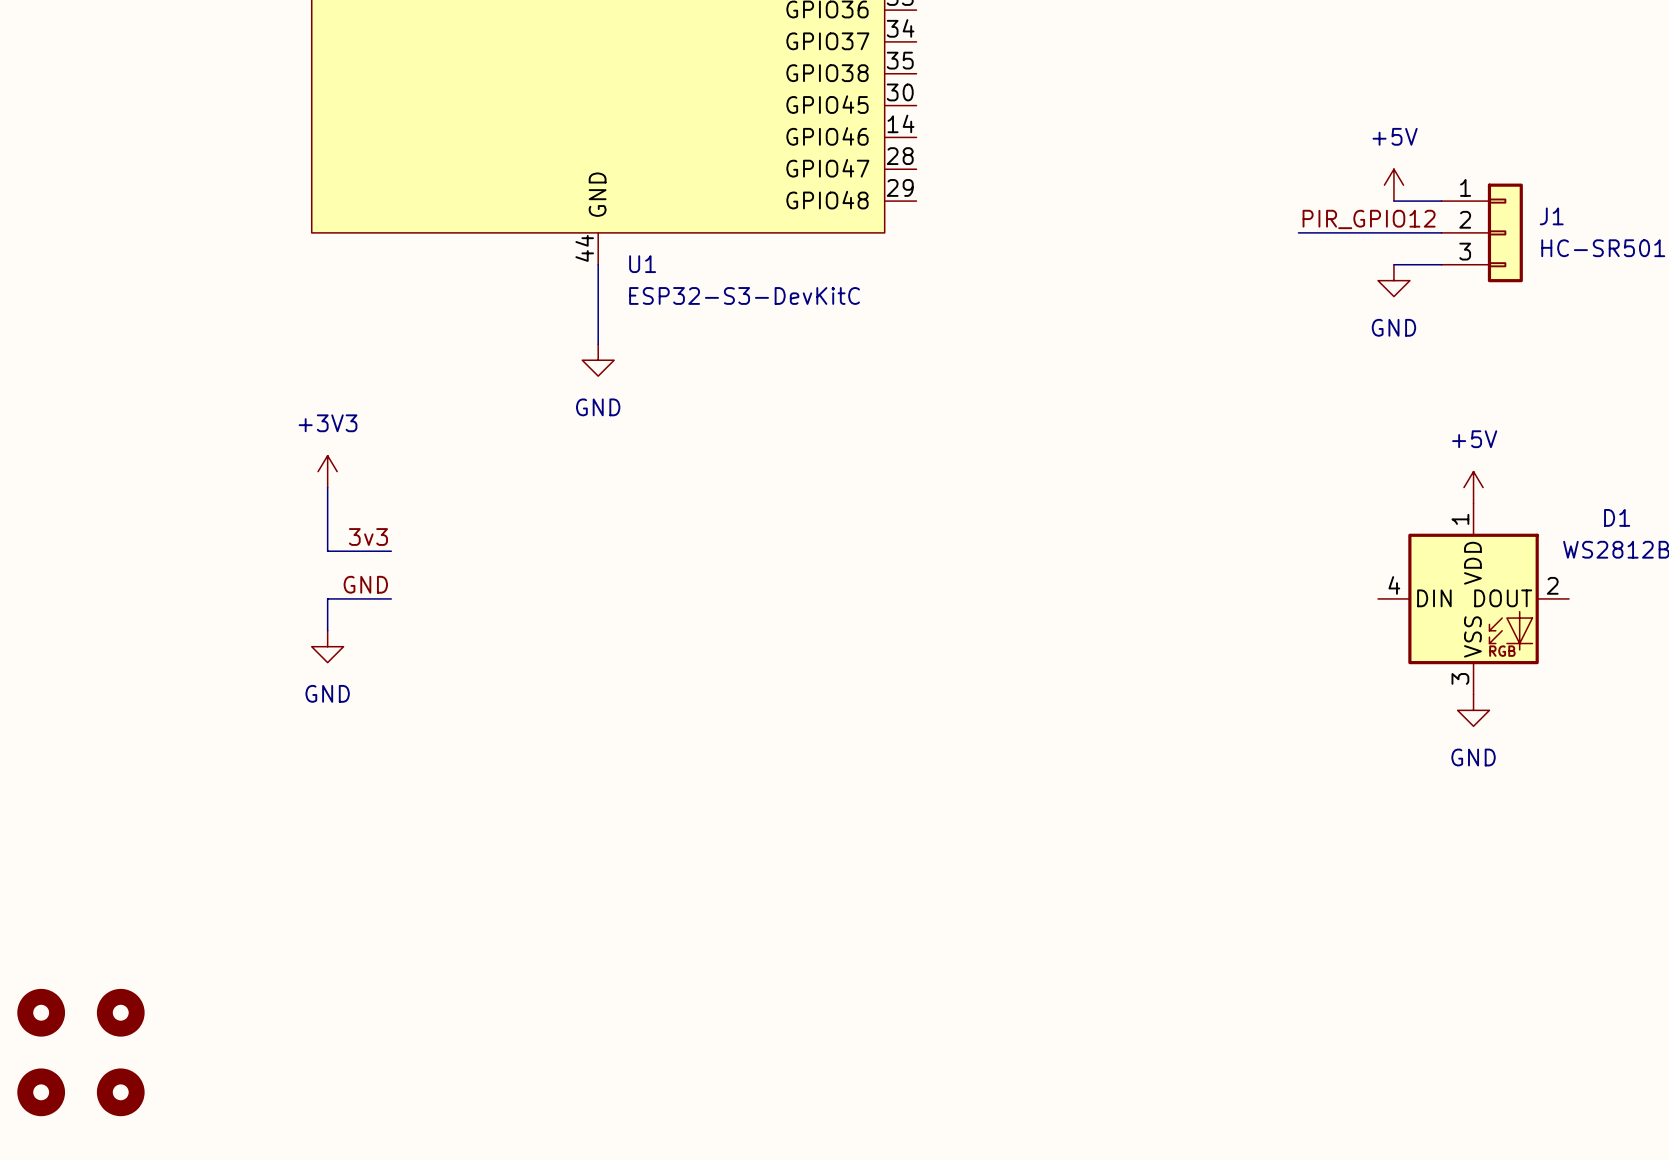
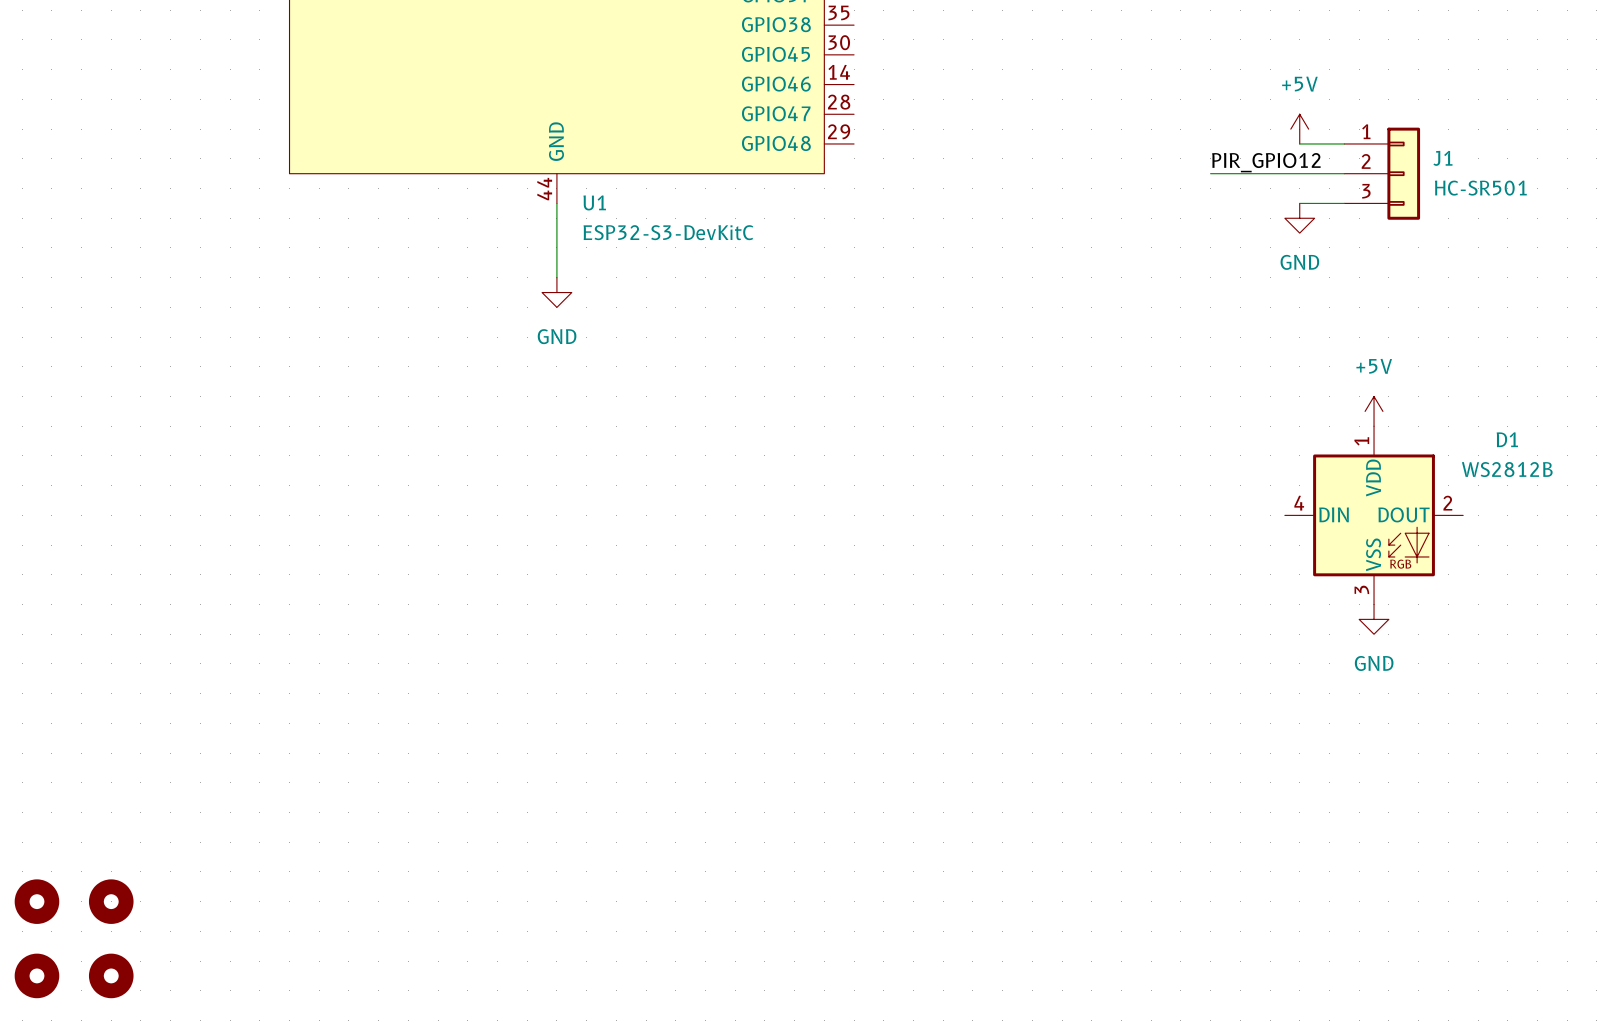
power symbol: +3V3 (327, 471) -> none
wire: (327, 487) (327, 551) (391, 551) -> none
label: 3v3 (368, 537) -> none
label: GND (365, 584) -> none
wire: (391, 598) (327, 598) (327, 630) -> none
power symbol: GND (327, 646) -> none

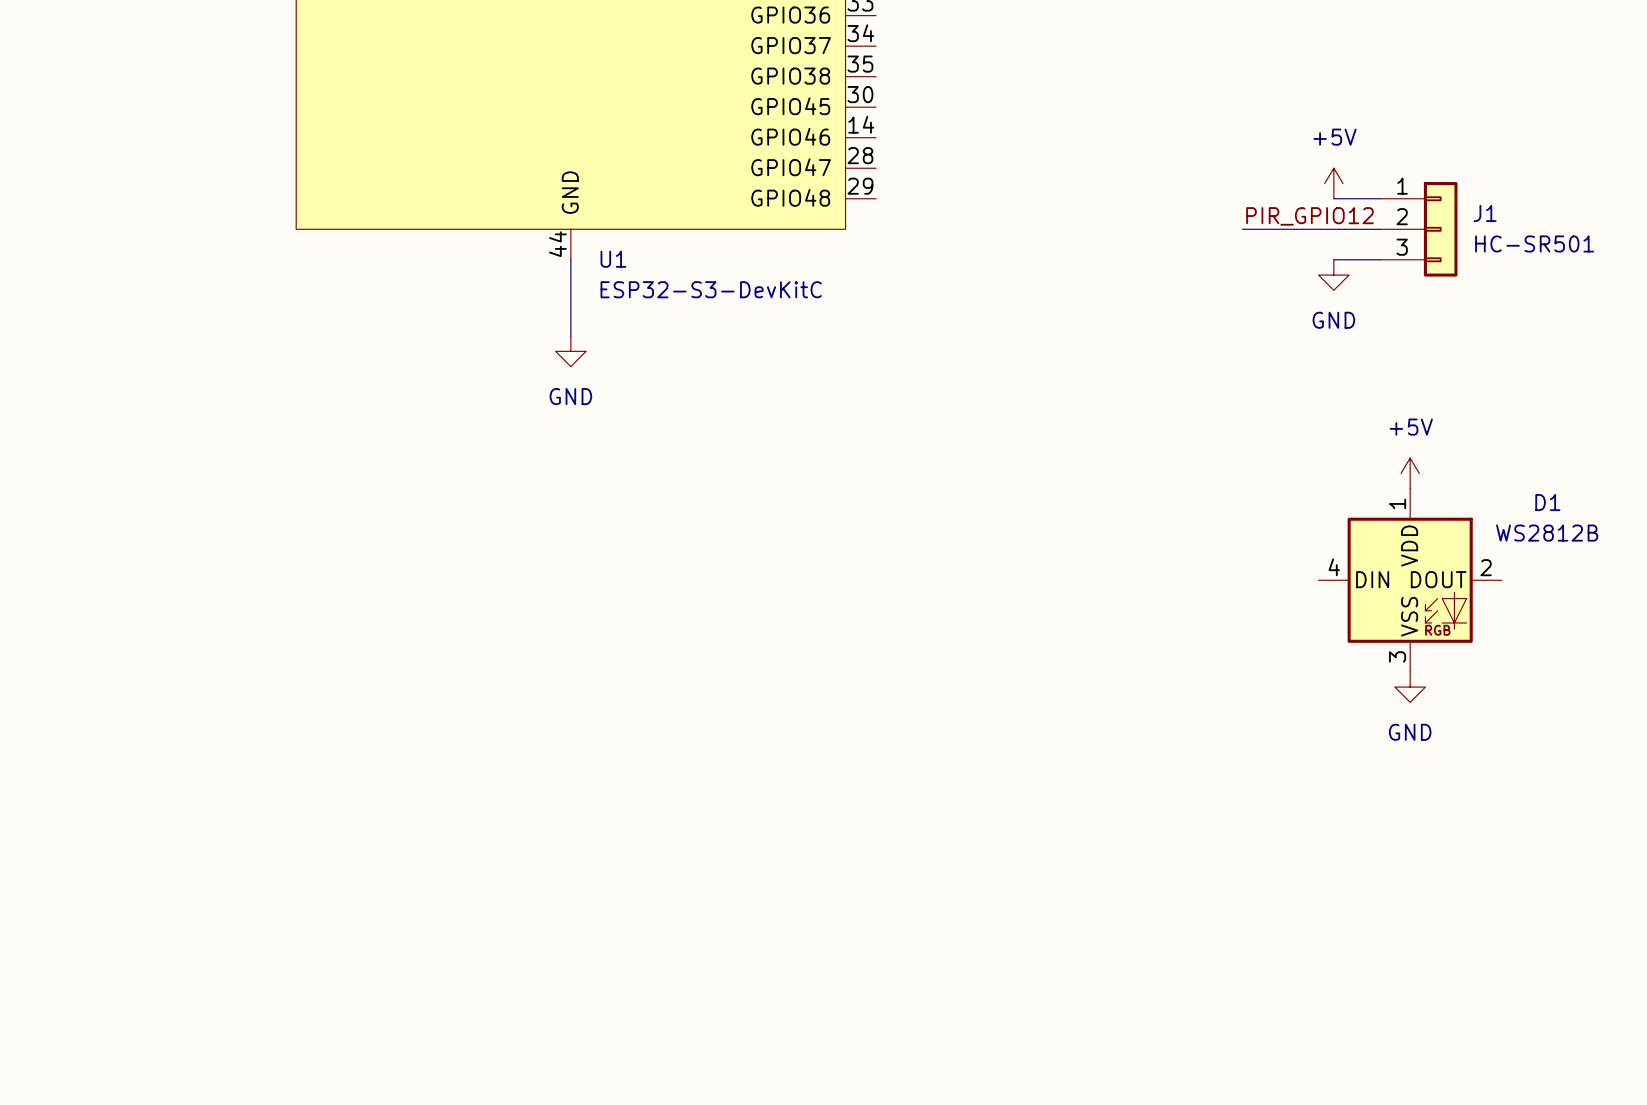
part: (36, 901) -> none
part: (111, 901) -> none
part: (36, 975) -> none
part: (111, 975) -> none

